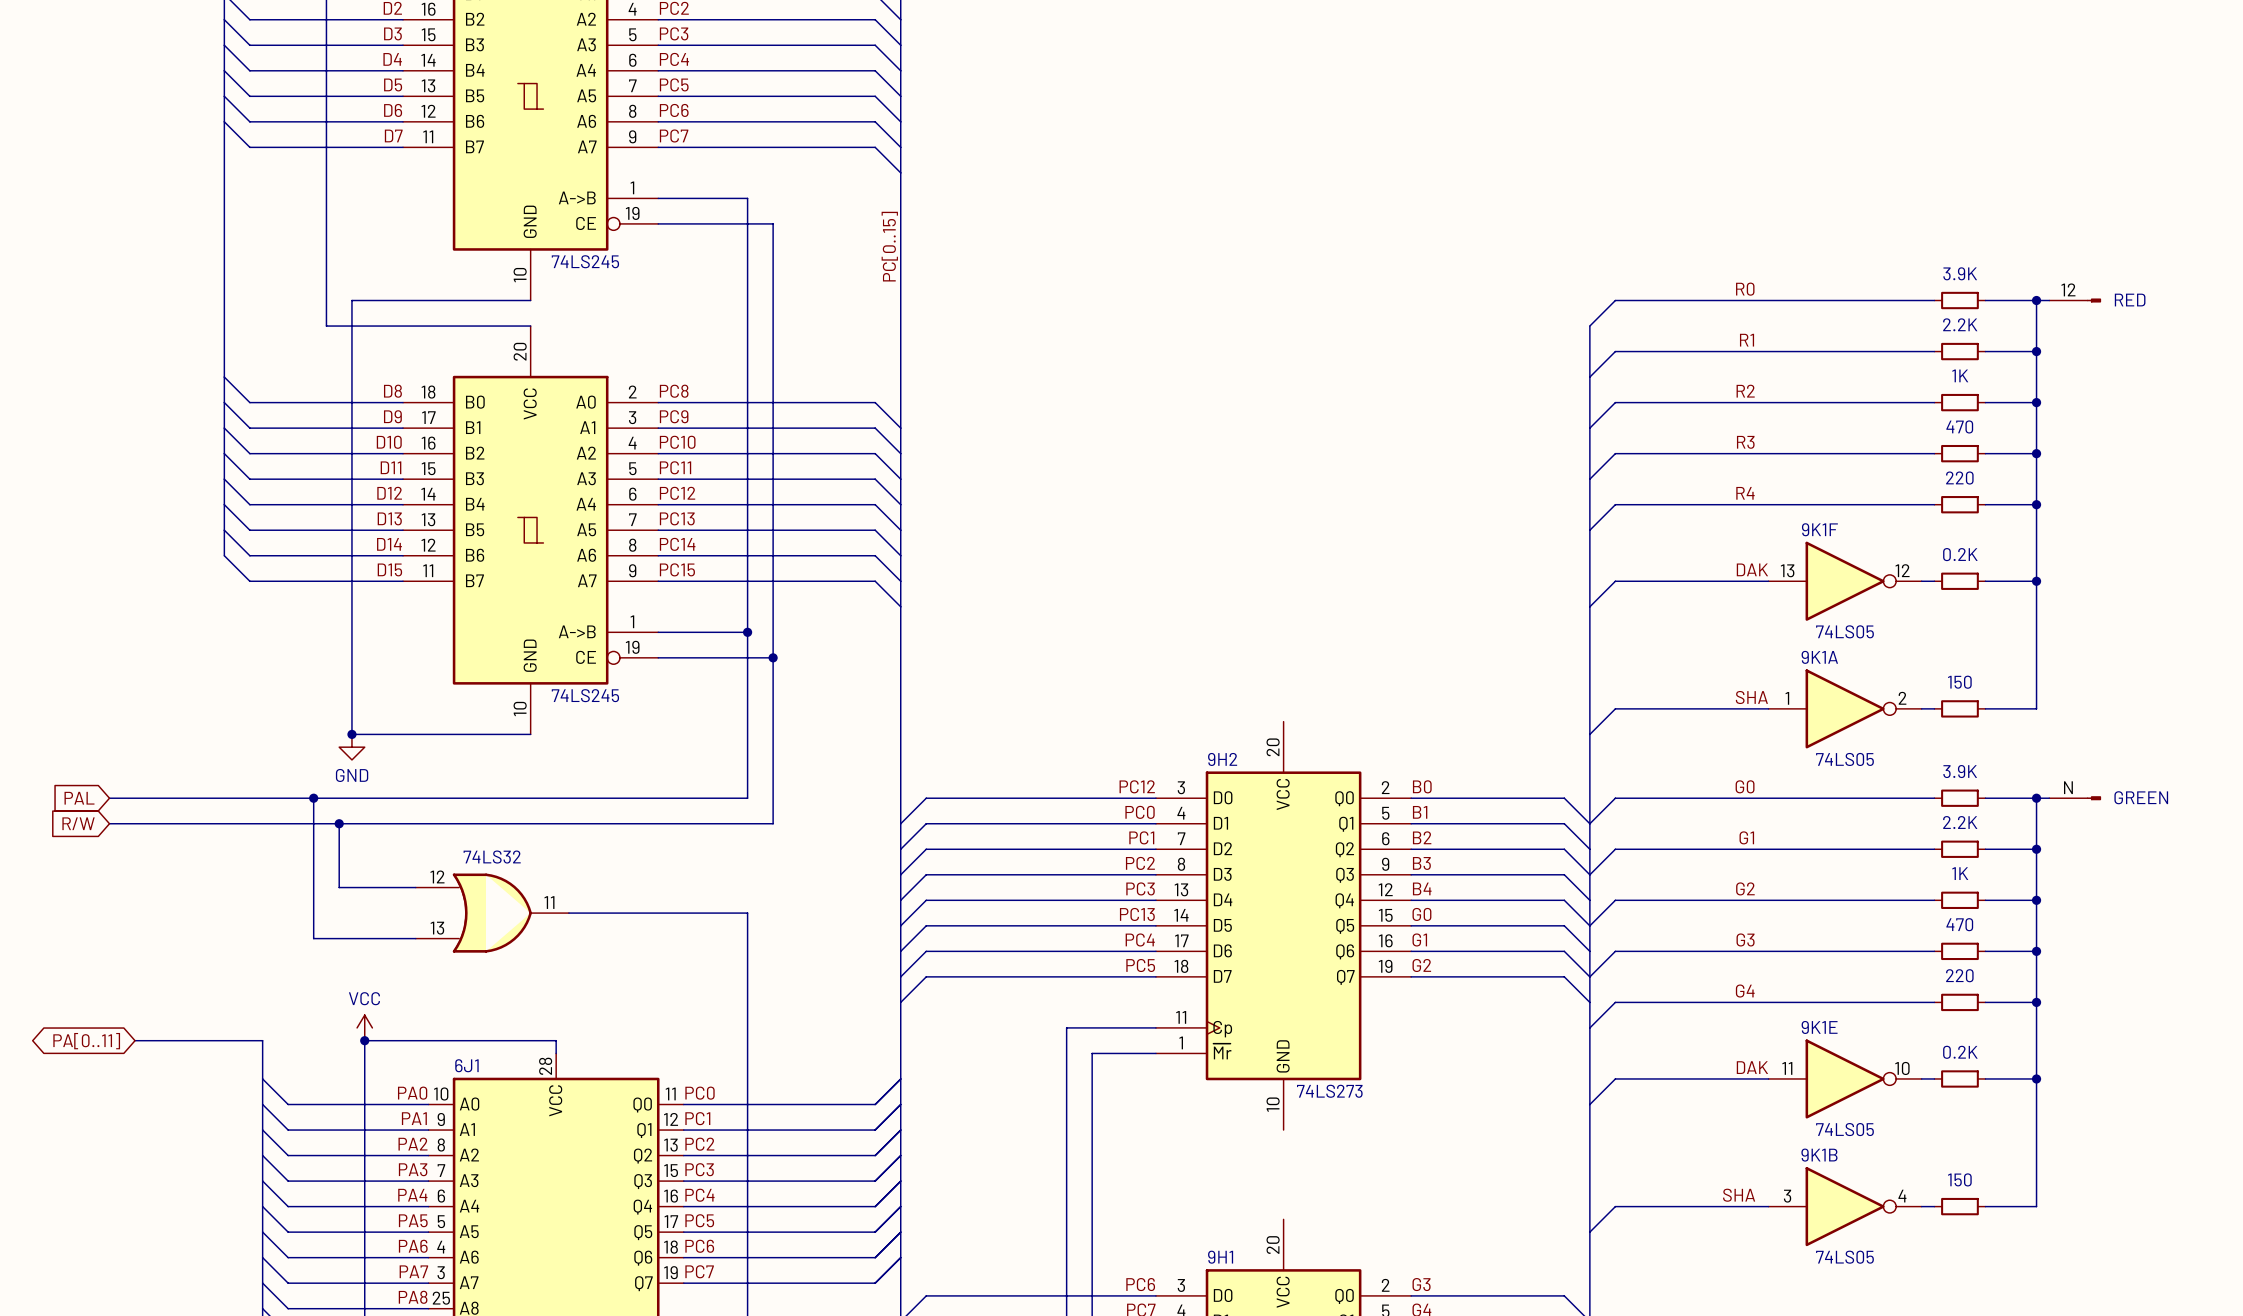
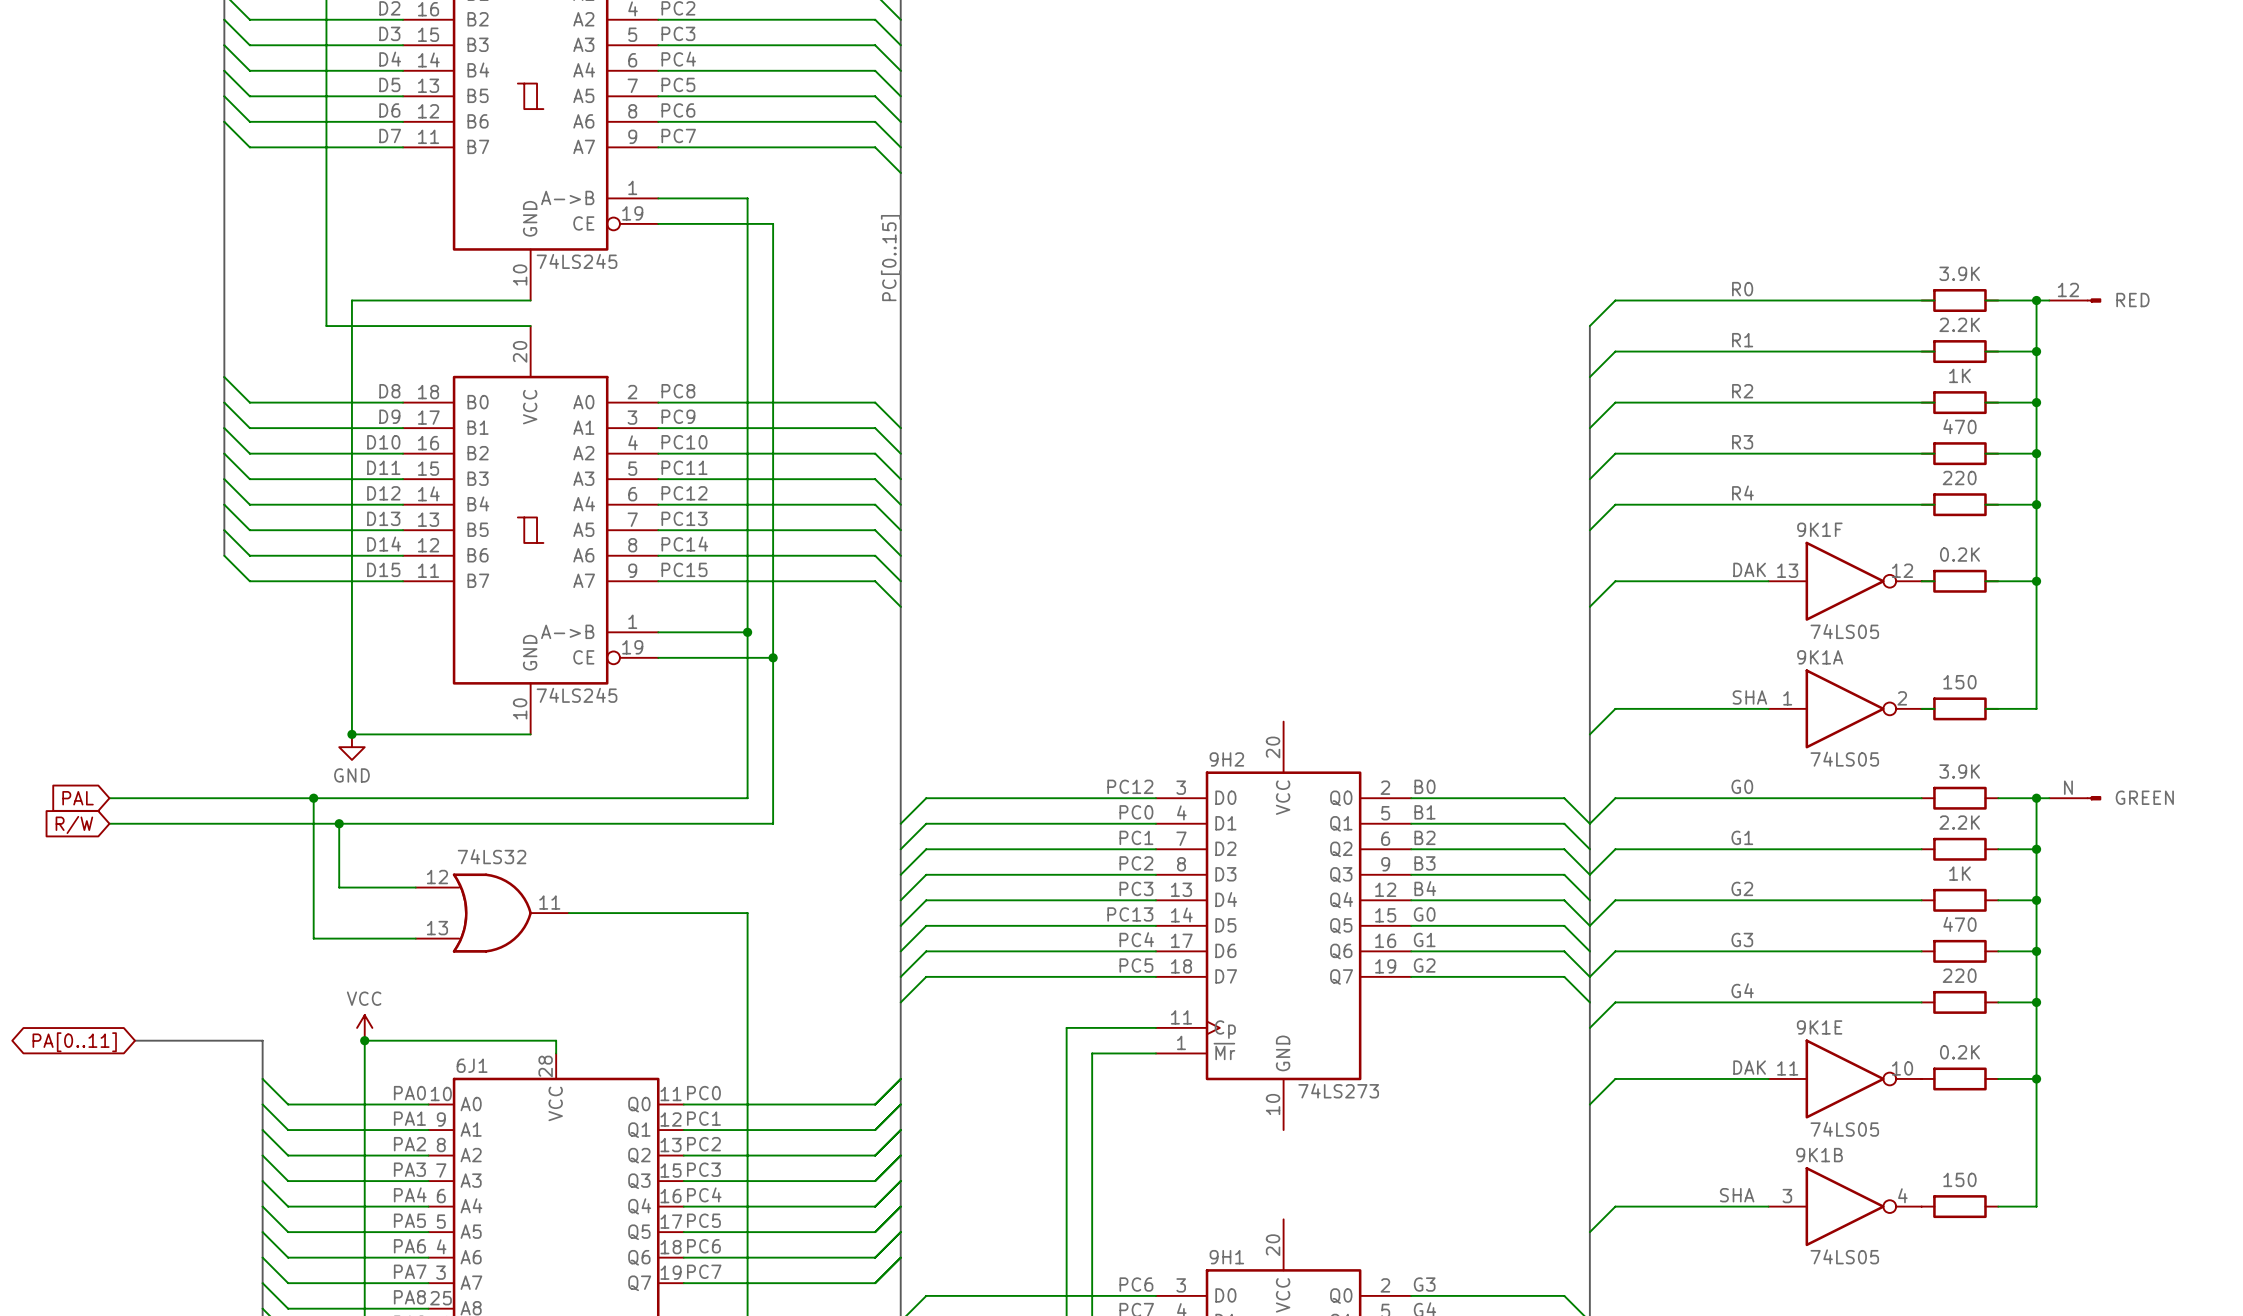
part symbol: [1934, 291, 1986, 310] -> [1921, 289, 1999, 312]
part symbol: [1934, 342, 1986, 361] -> [1921, 340, 1999, 364]
part symbol: [1934, 393, 1986, 412] -> [1921, 391, 1999, 415]
part symbol: [1934, 444, 1986, 463] -> [1921, 442, 1999, 466]
part symbol: [1934, 496, 1986, 514] -> [1921, 493, 1999, 517]
part symbol: [1934, 572, 1986, 590] -> [1921, 569, 1999, 593]
part symbol: [1934, 700, 1986, 718] -> [1921, 697, 1999, 721]
part symbol: [1934, 789, 1986, 807] -> [1921, 786, 1999, 810]
part symbol: [1934, 840, 1986, 858] -> [1921, 837, 1999, 861]
part symbol: [1934, 891, 1986, 909] -> [1921, 888, 1999, 912]
part symbol: [1934, 942, 1986, 961] -> [1921, 939, 1999, 963]
part symbol: [1934, 993, 1986, 1012] -> [1921, 990, 1999, 1014]
part symbol: [1934, 1070, 1986, 1088] -> [1921, 1067, 1999, 1091]
part symbol: [1934, 1197, 1986, 1216] -> [1921, 1195, 1999, 1219]

